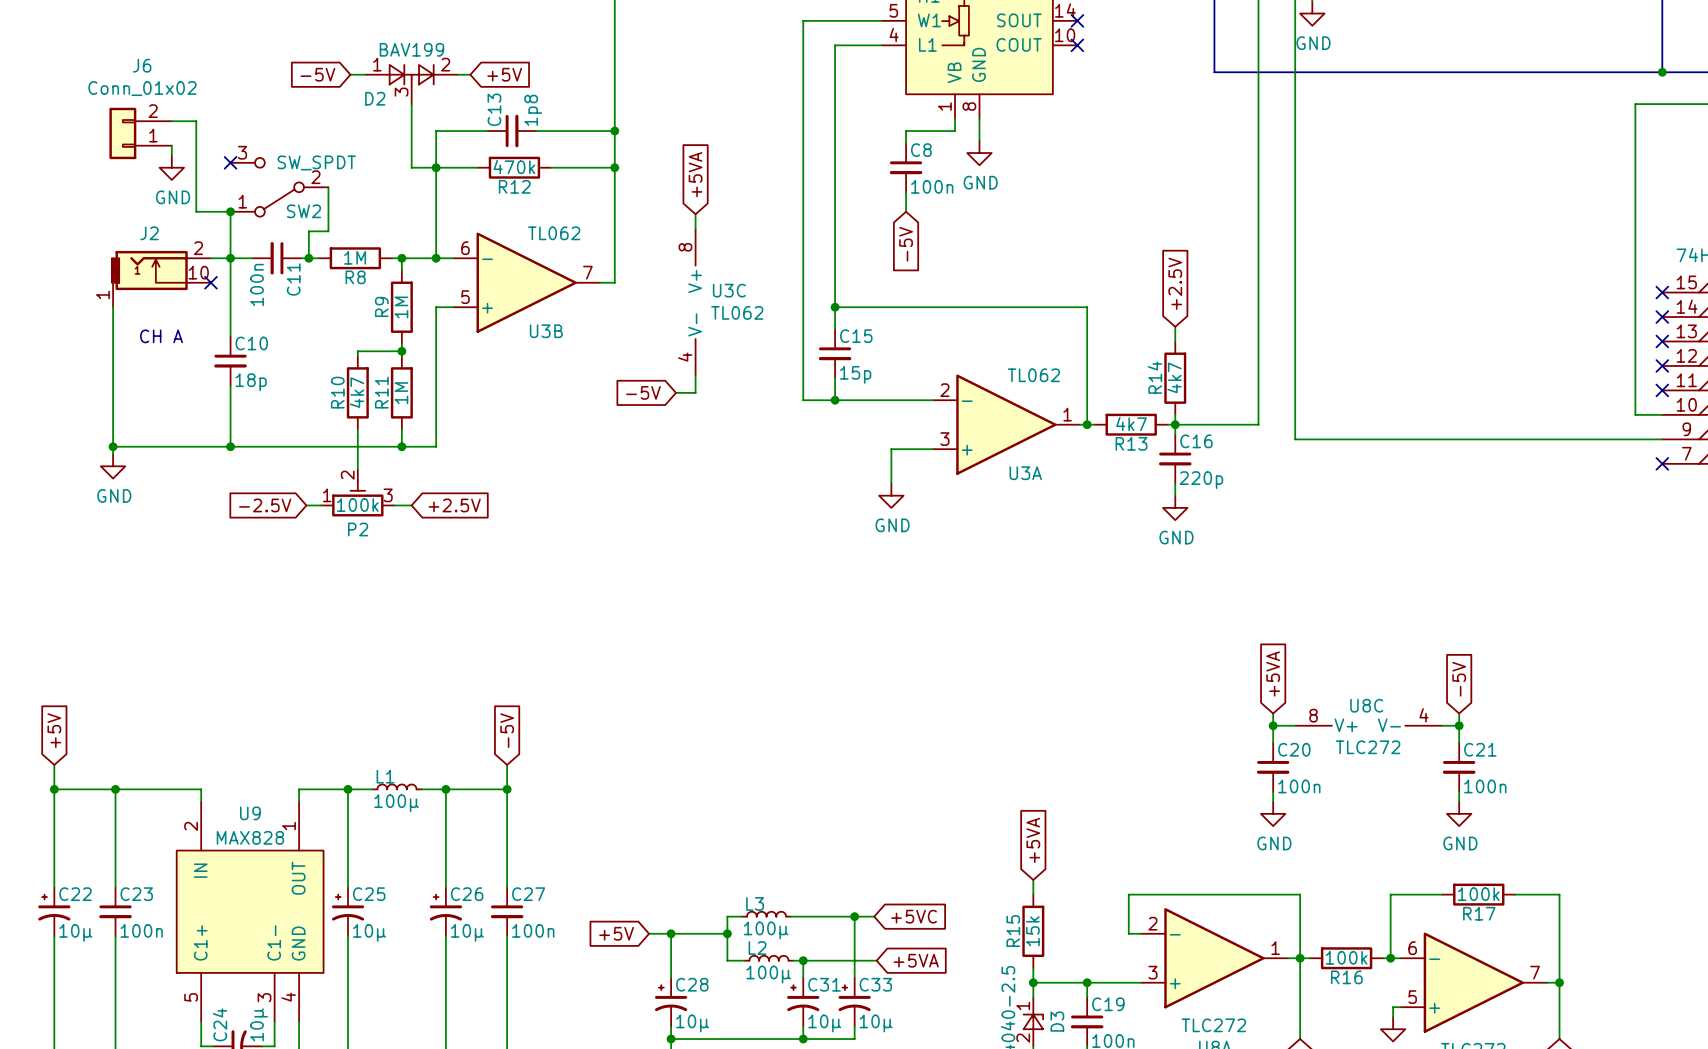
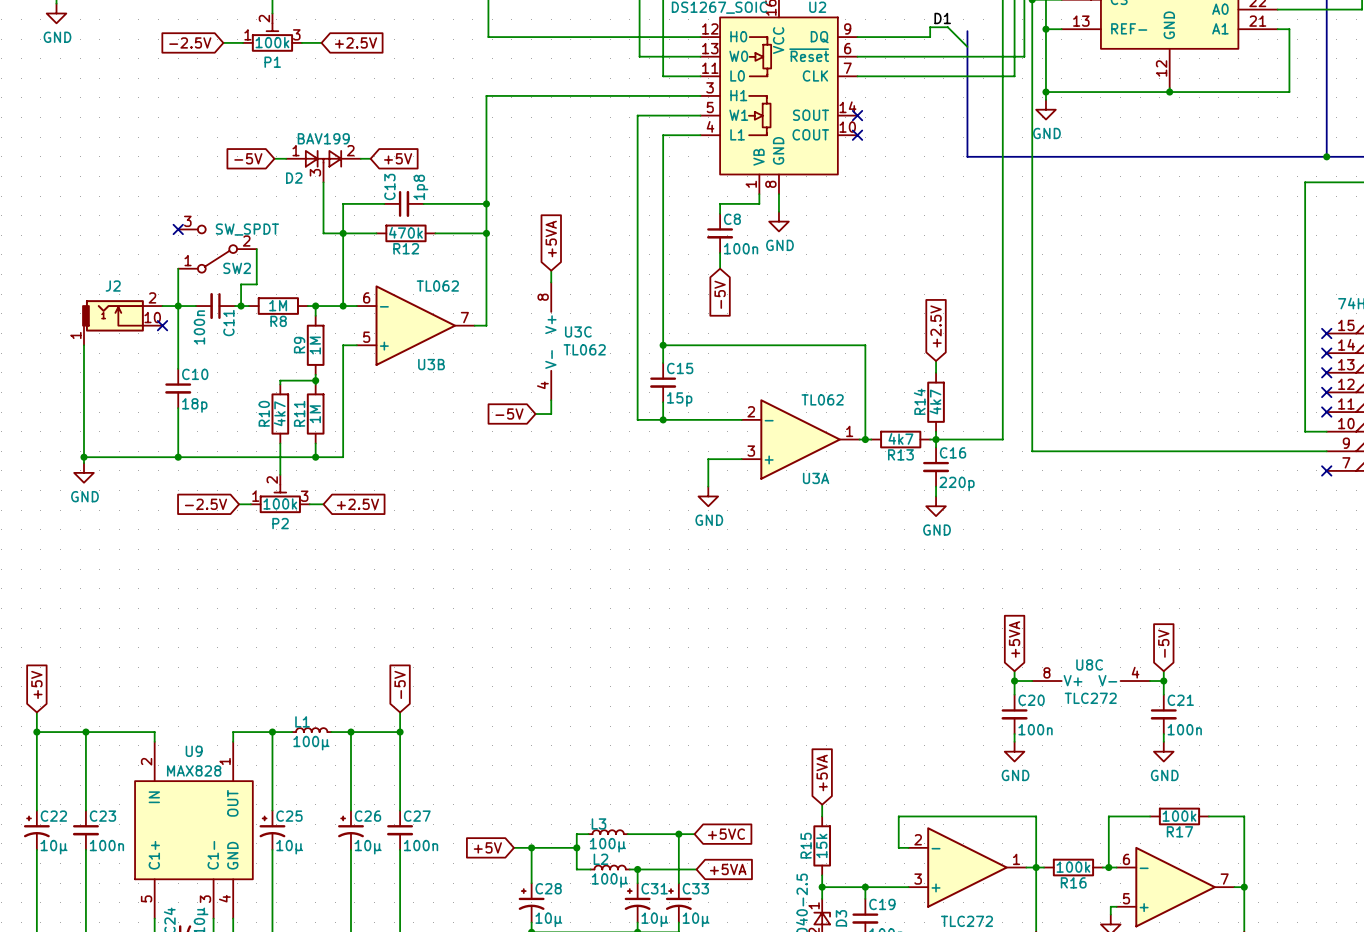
wire: (171, 121) (196, 121) (196, 211) (230, 211) -> none
J6: Conn_01x02 (140, 133) -> none
wire: (171, 145) (171, 155) -> none
power symbol: GND (171, 167) -> none
junction: (230, 211) -> none
text: CH A (161, 336) -> none

